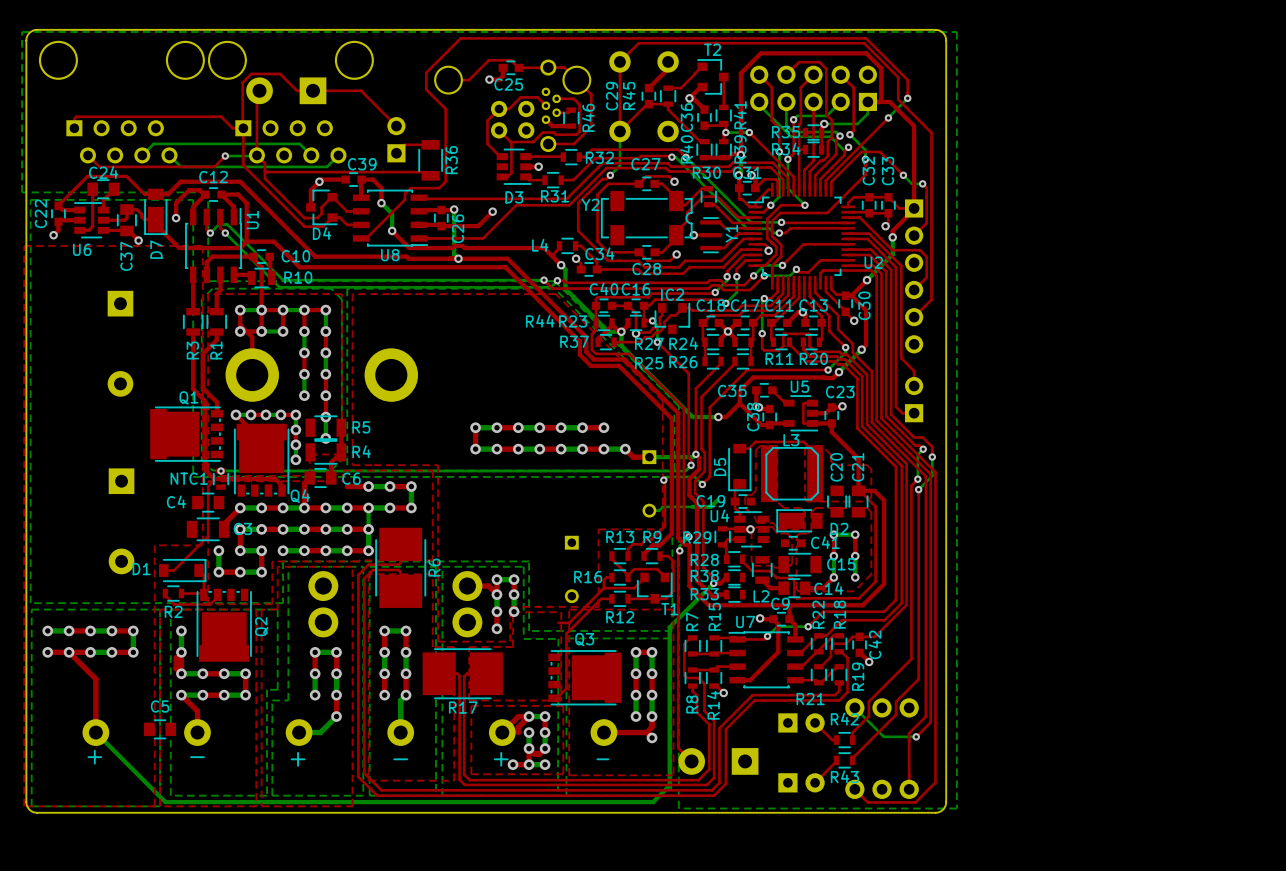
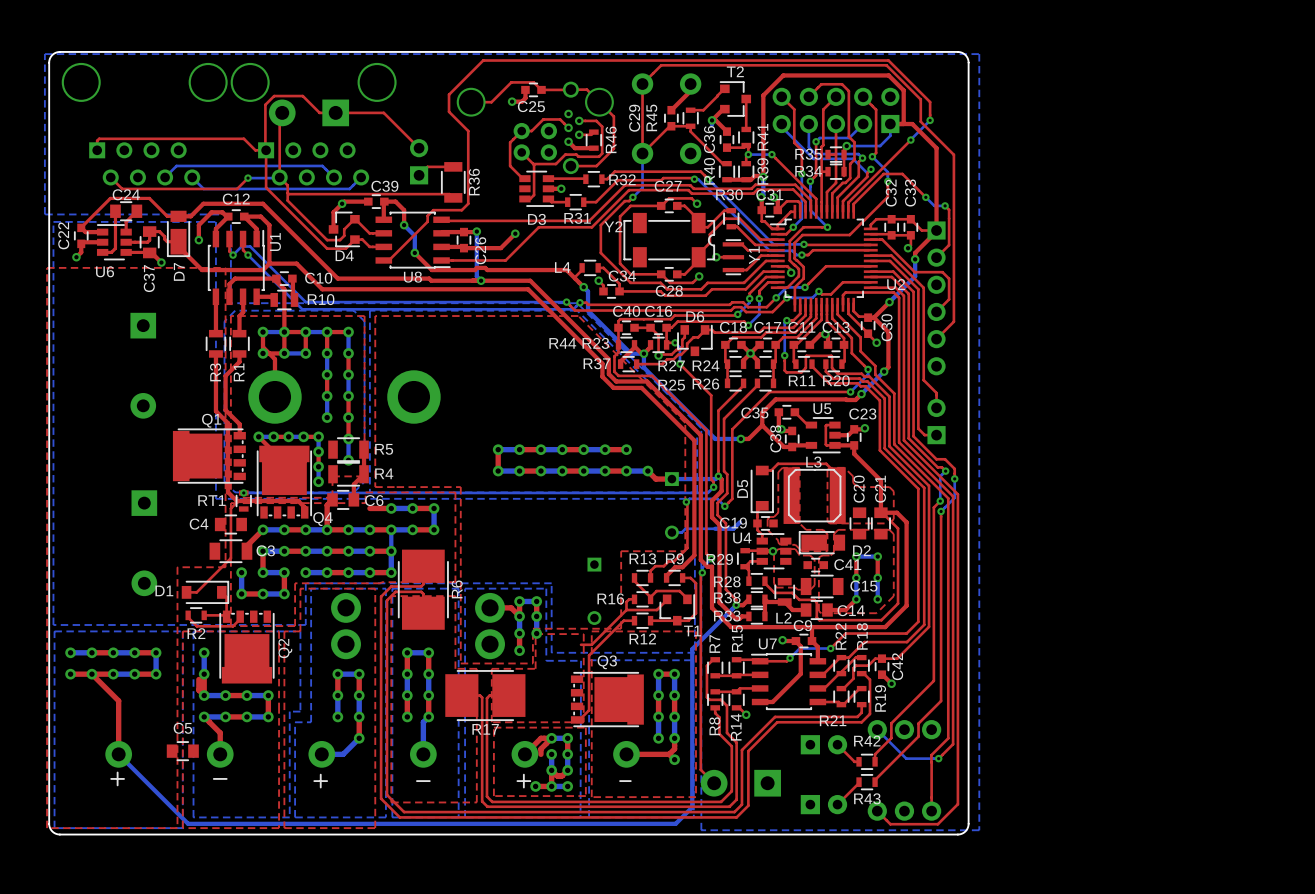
IC2 name: IC2 (672, 294) -> D6 (695, 316)
NTC1 name: NTC1 (189, 478) -> RT1 (211, 500)
top track: none -> (784, 602) (767, 602) (764, 599) (764, 616)

